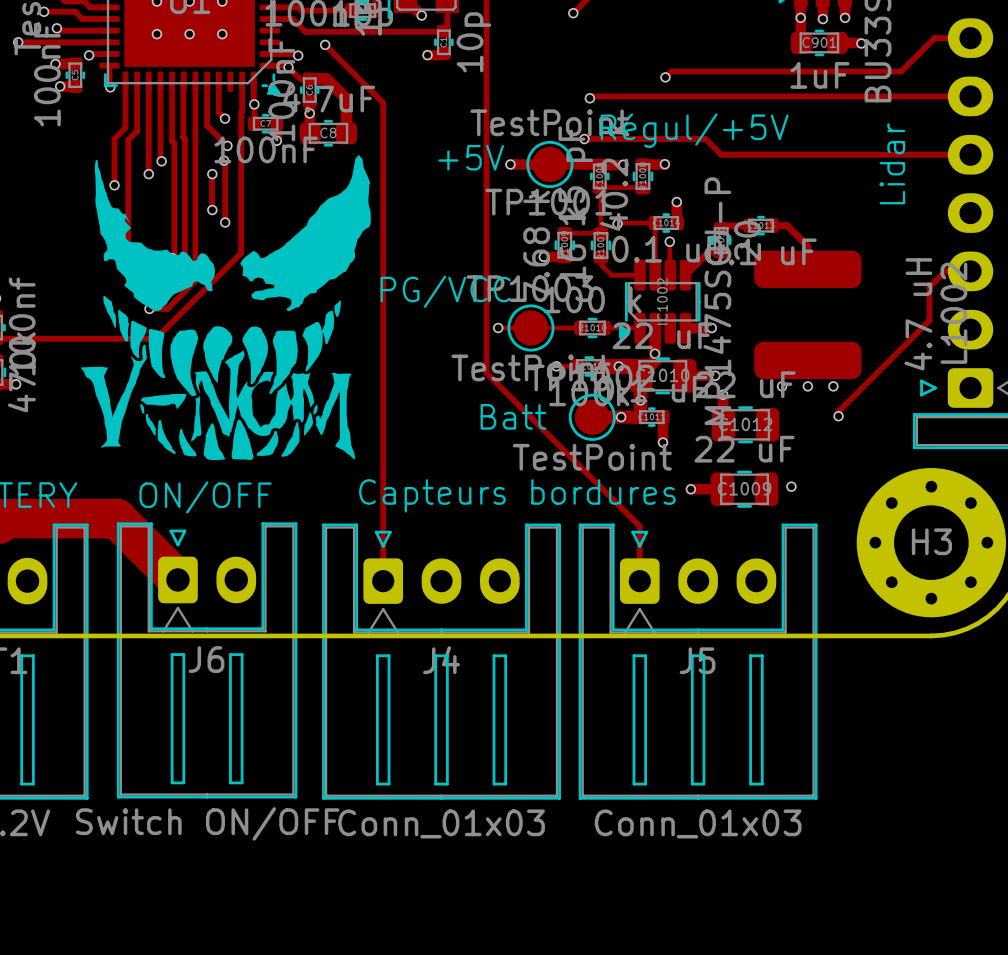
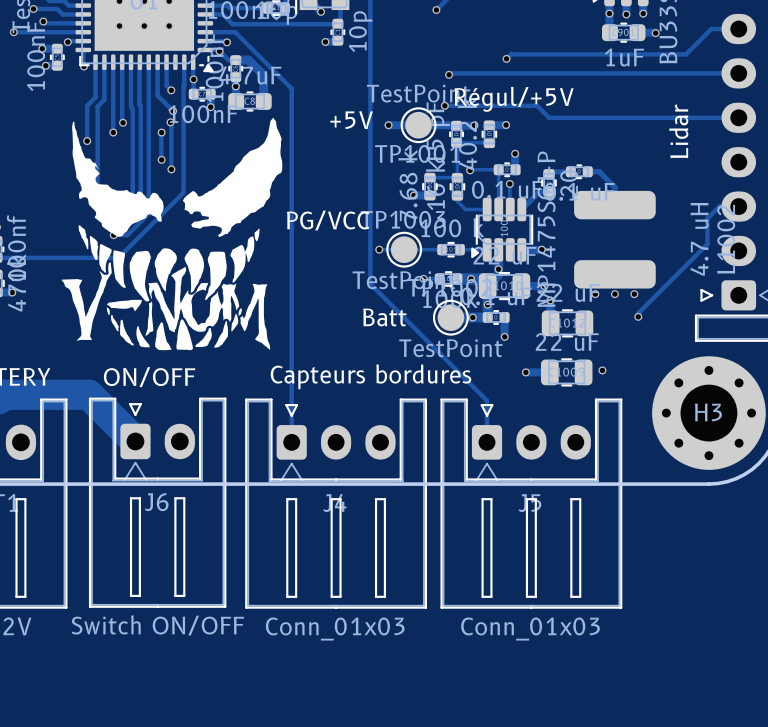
track: (325, 44) (383, 102) (383, 116) -> (205, 32) (235, 32) (291, 88)
via: (325, 44) -> none

